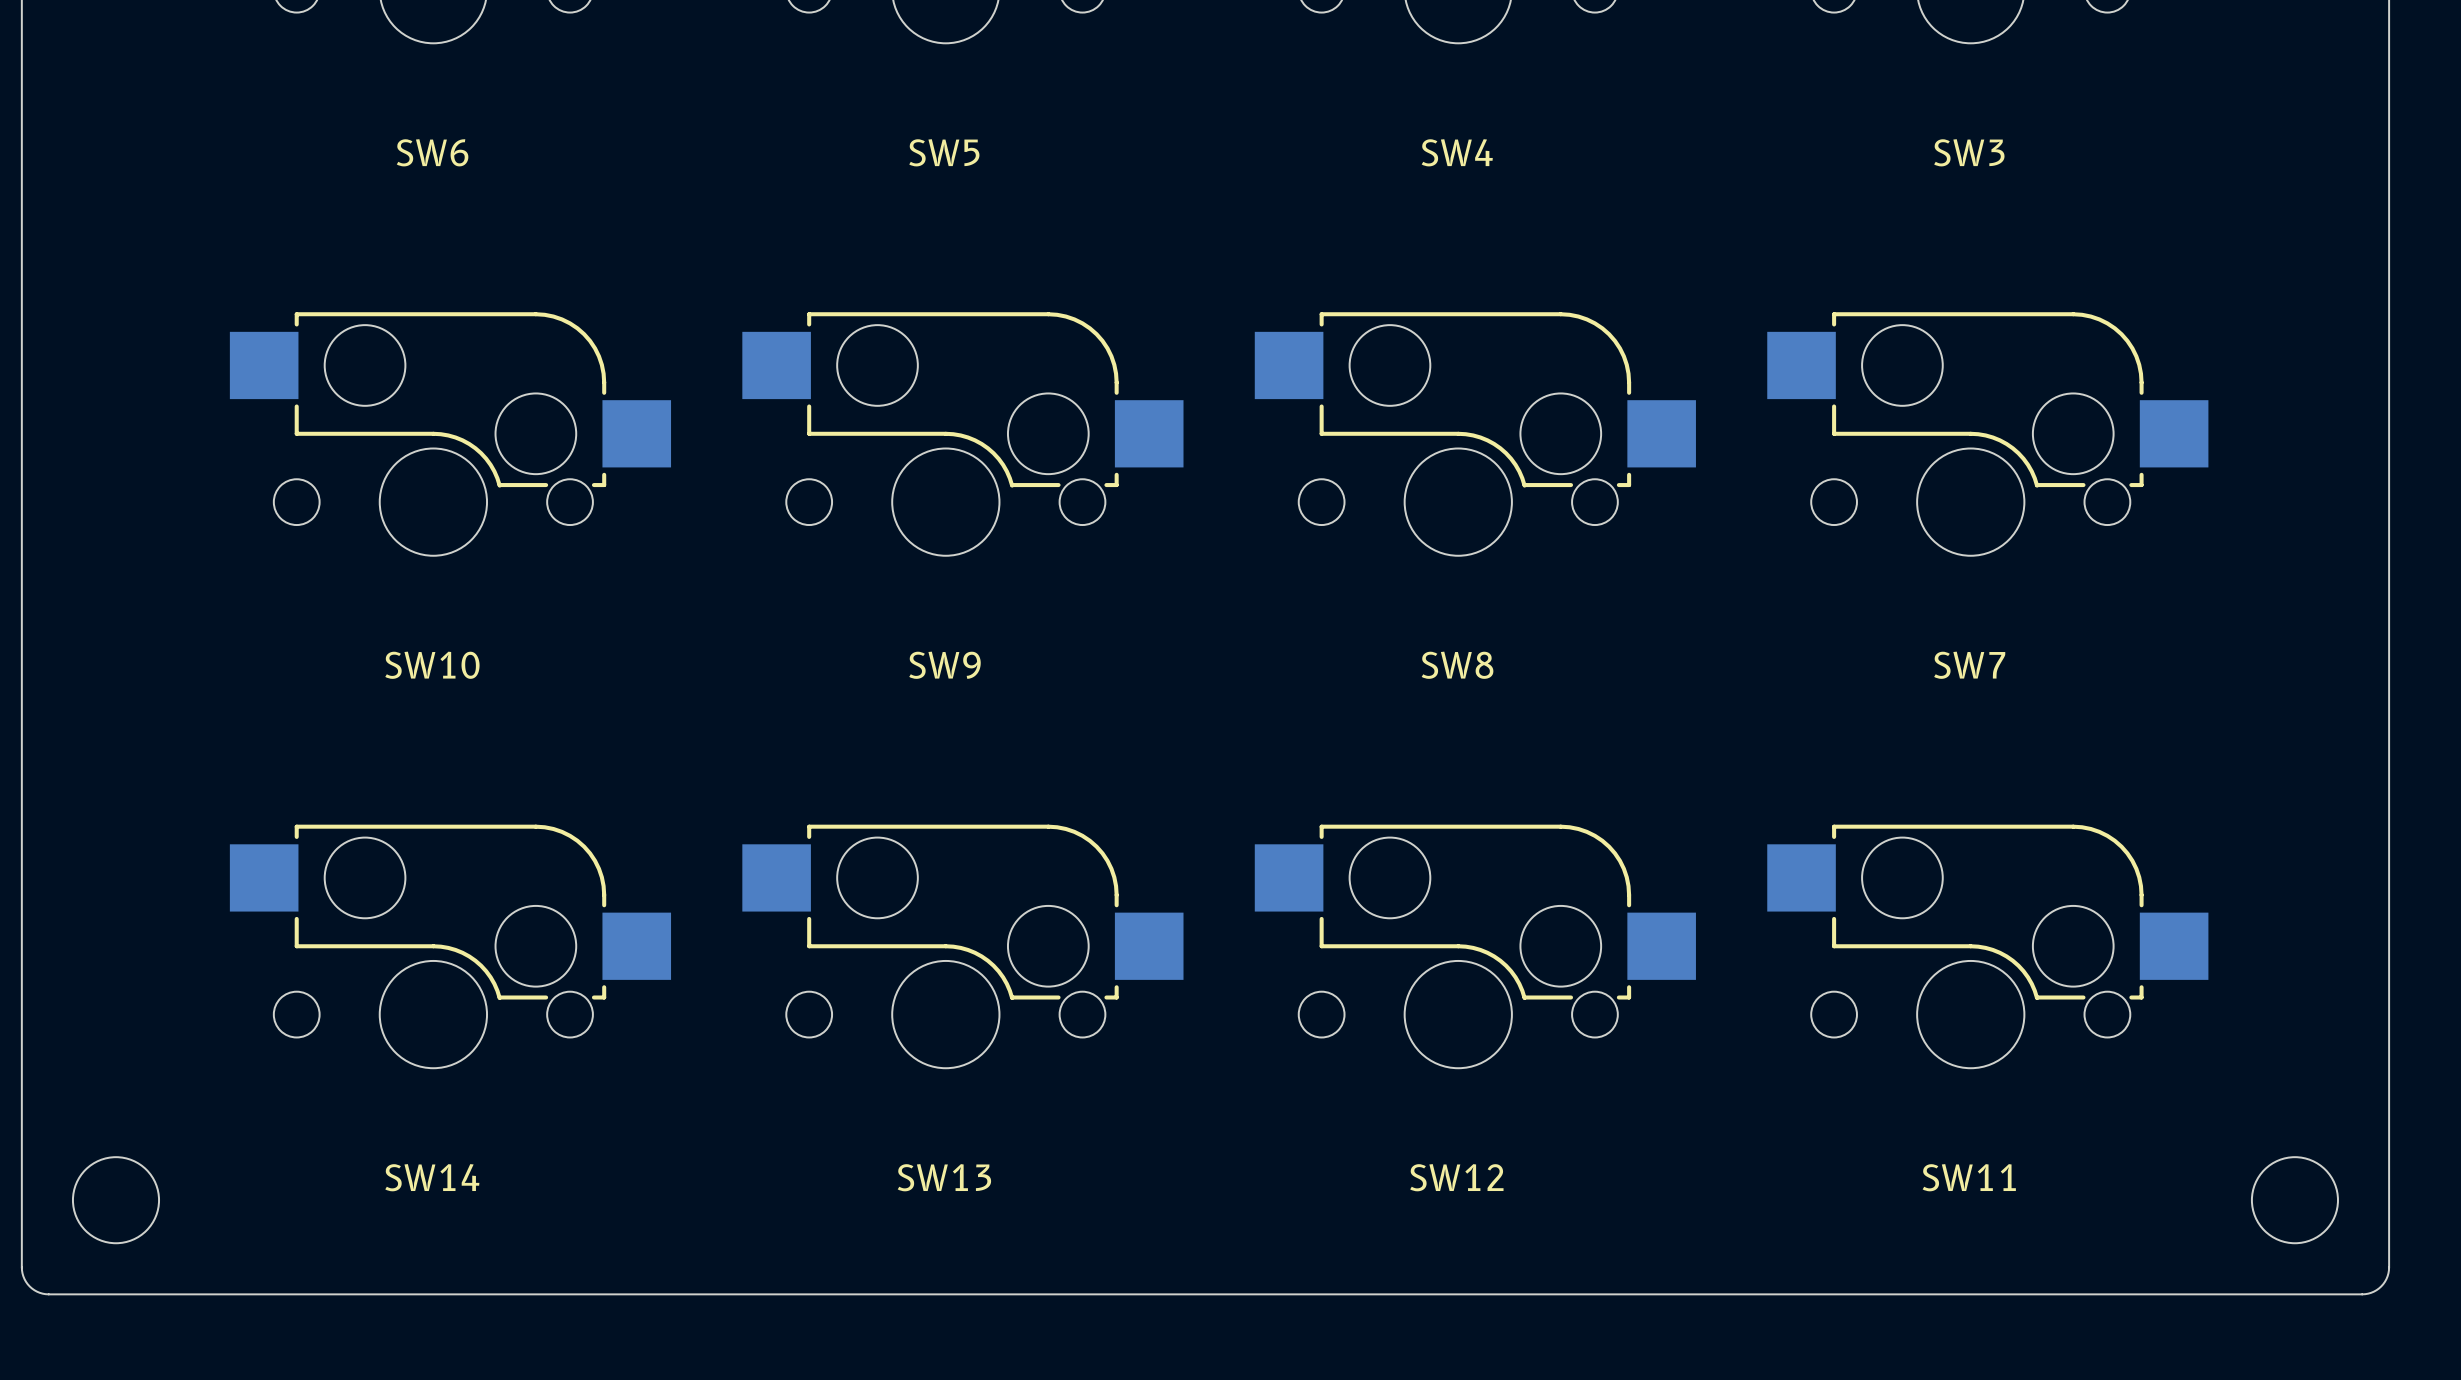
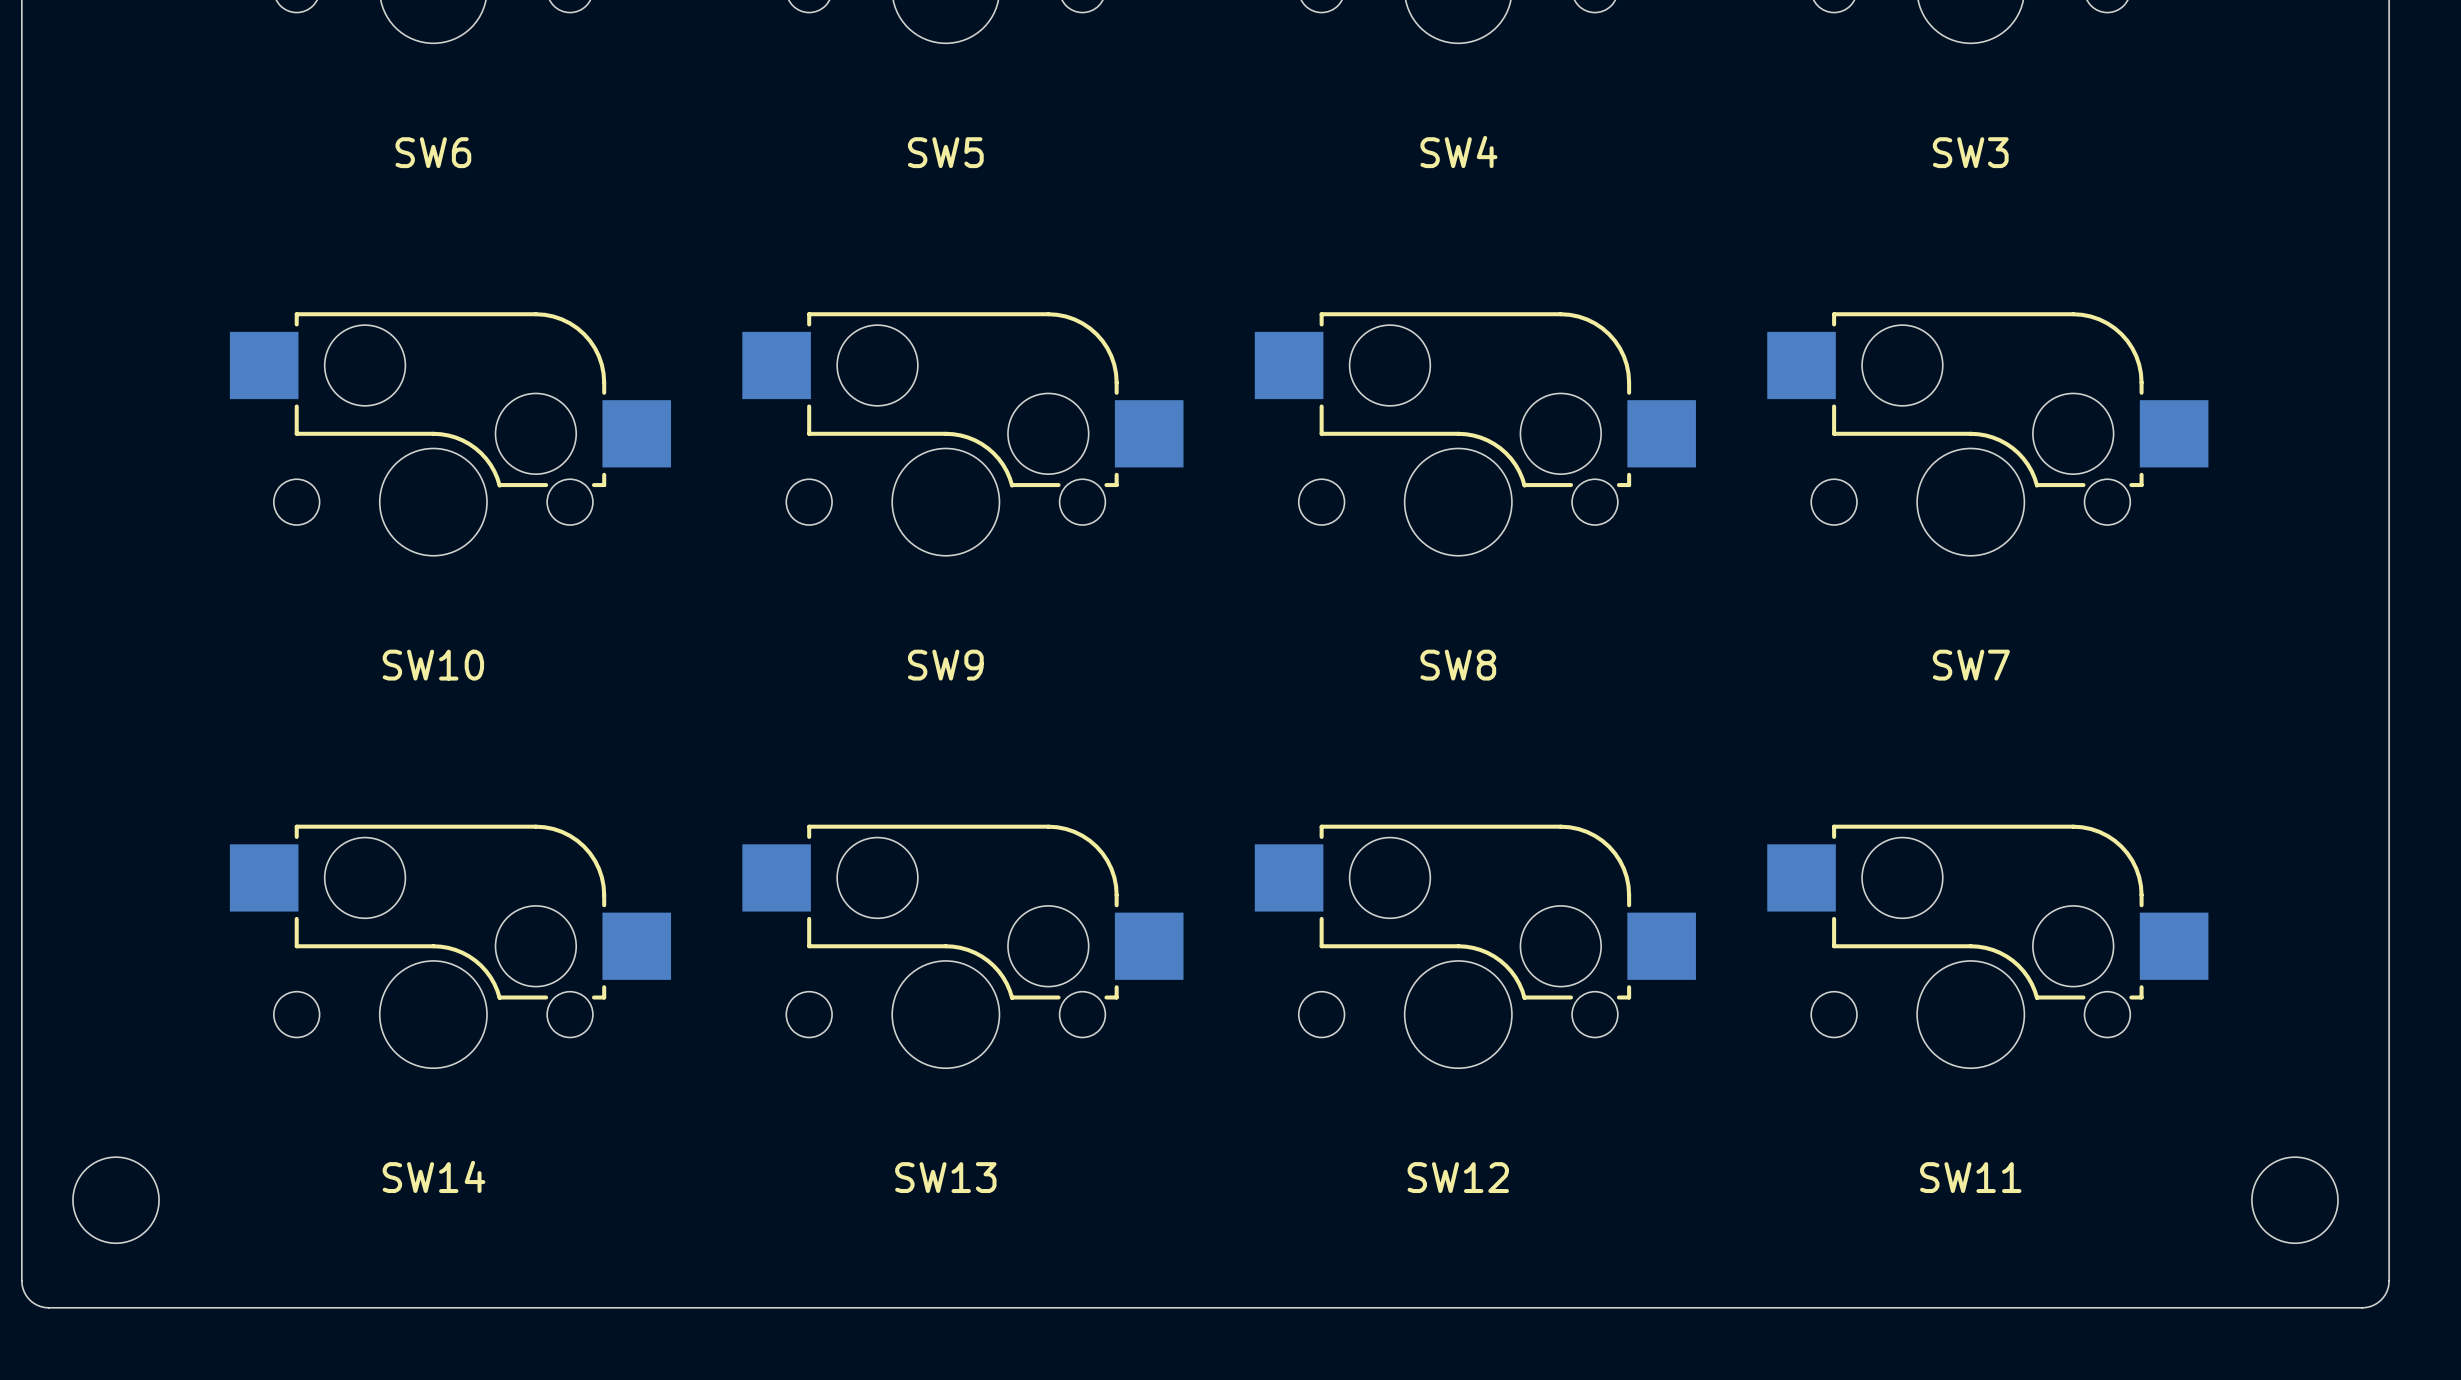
board edge: (2389, 1267) (2387, 1276) (2381, 1286) (2373, 1291) (2362, 1294) (48, 1294) (39, 1292) (29, 1286) (23, 1276) (21, 1267) -> (2389, 1267) (2388, 1283) (2384, 1295) (2373, 1305) (2362, 1307) (48, 1307) (37, 1305) (25, 1295) (22, 1283) (21, 1267)

